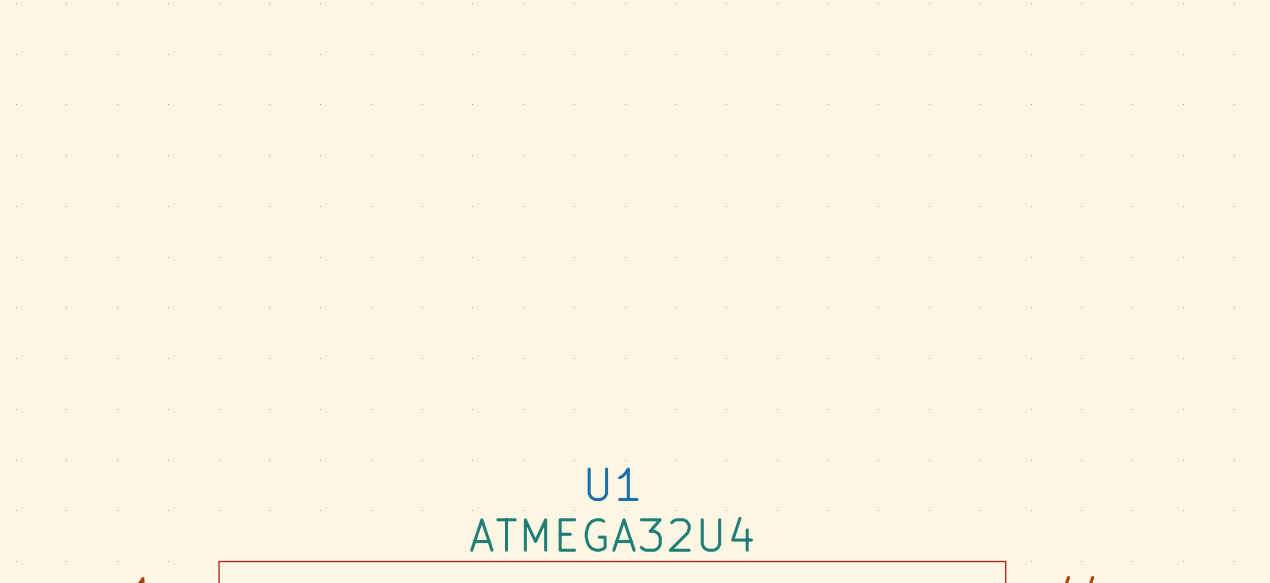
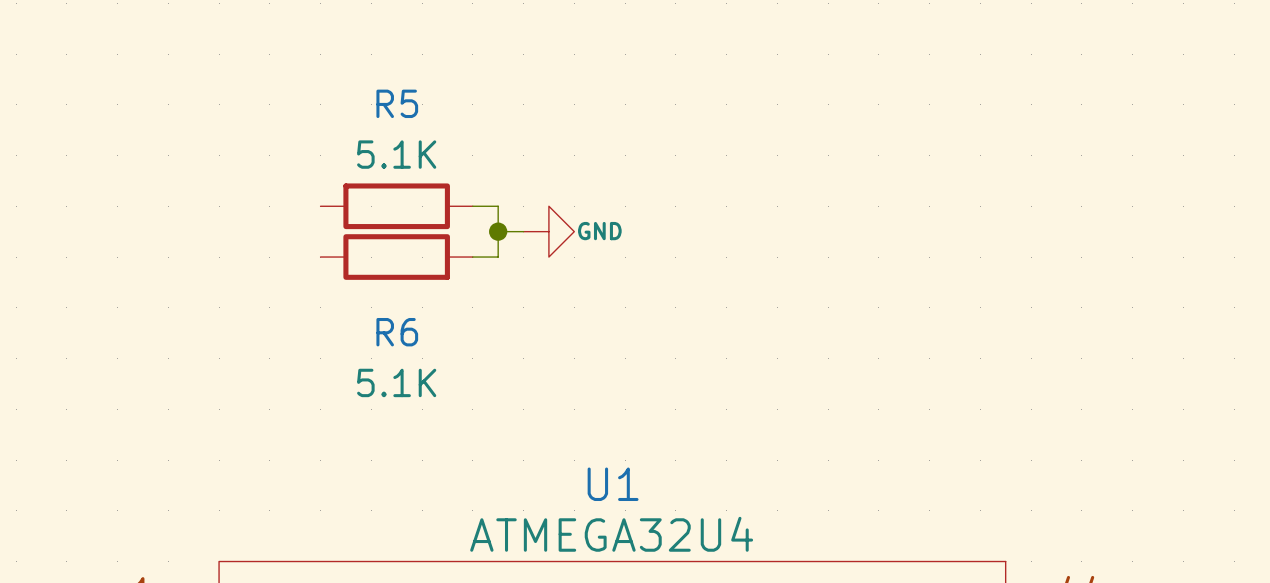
R5: none -> 5.1K (396, 206)
wire: none -> (472, 206) (498, 206) (498, 257) (472, 257)
wire: none -> (498, 231) (523, 231)
junction: none -> (498, 231)
power symbol: none -> GND (548, 231)
R6: none -> 5.1K (396, 257)

